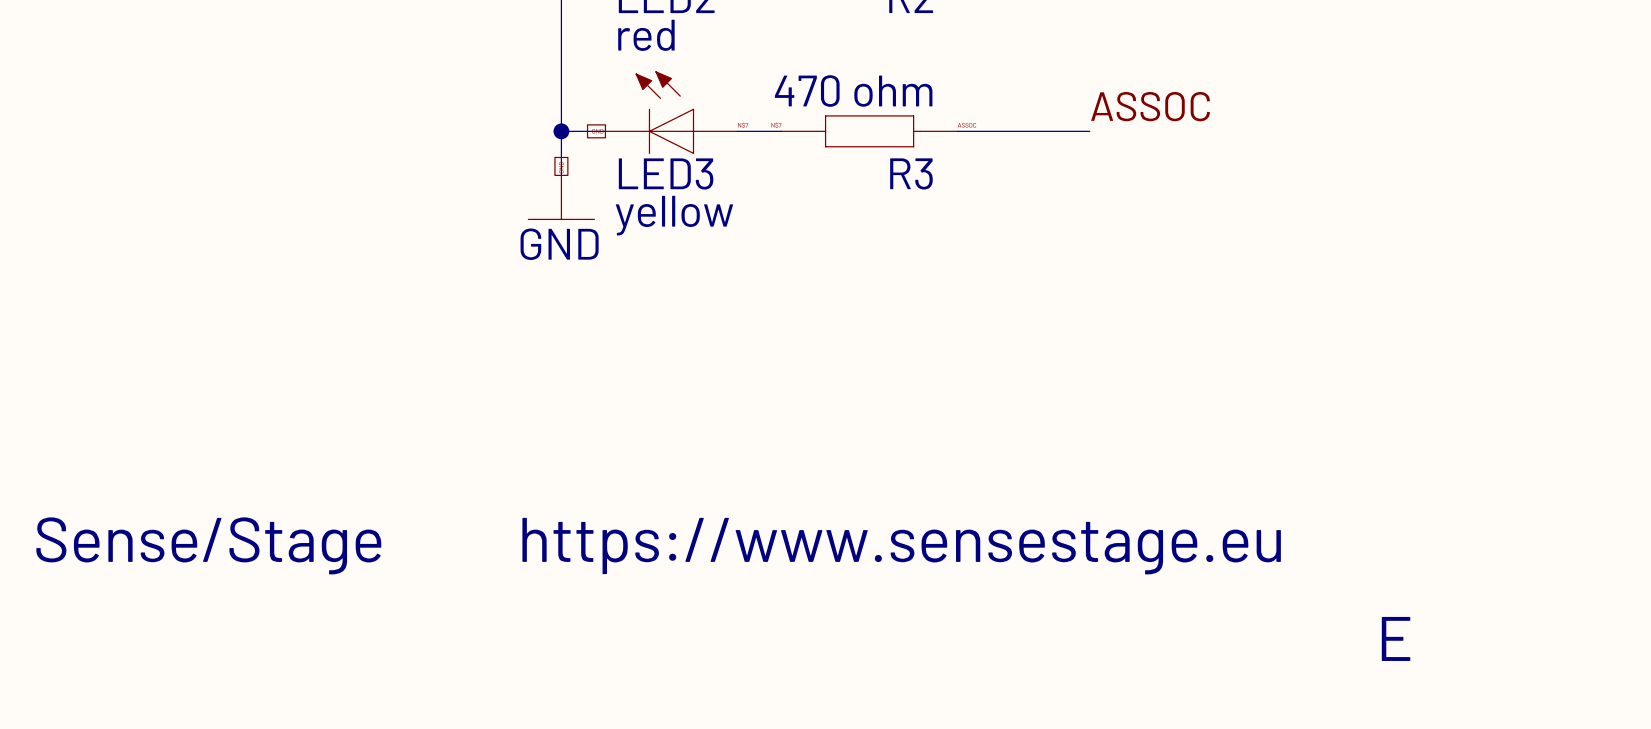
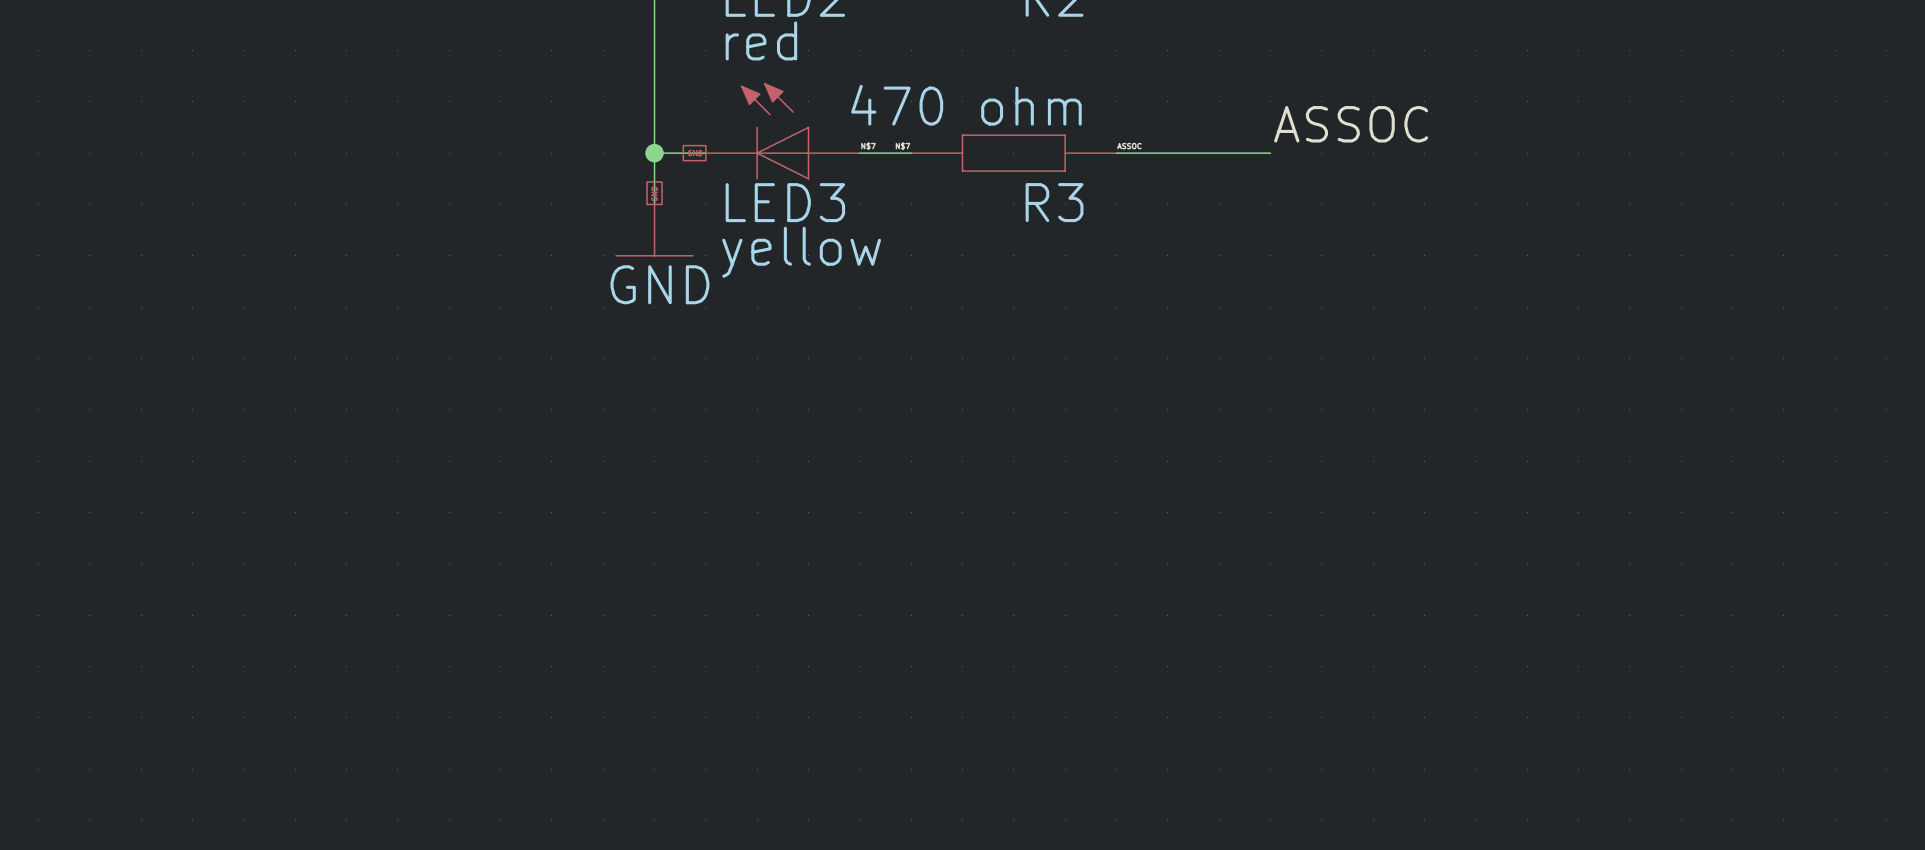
text: Sense/Stage (208, 545) -> none
text: https://www.sensestage.eu (901, 546) -> none
text: E (1396, 638) -> none

